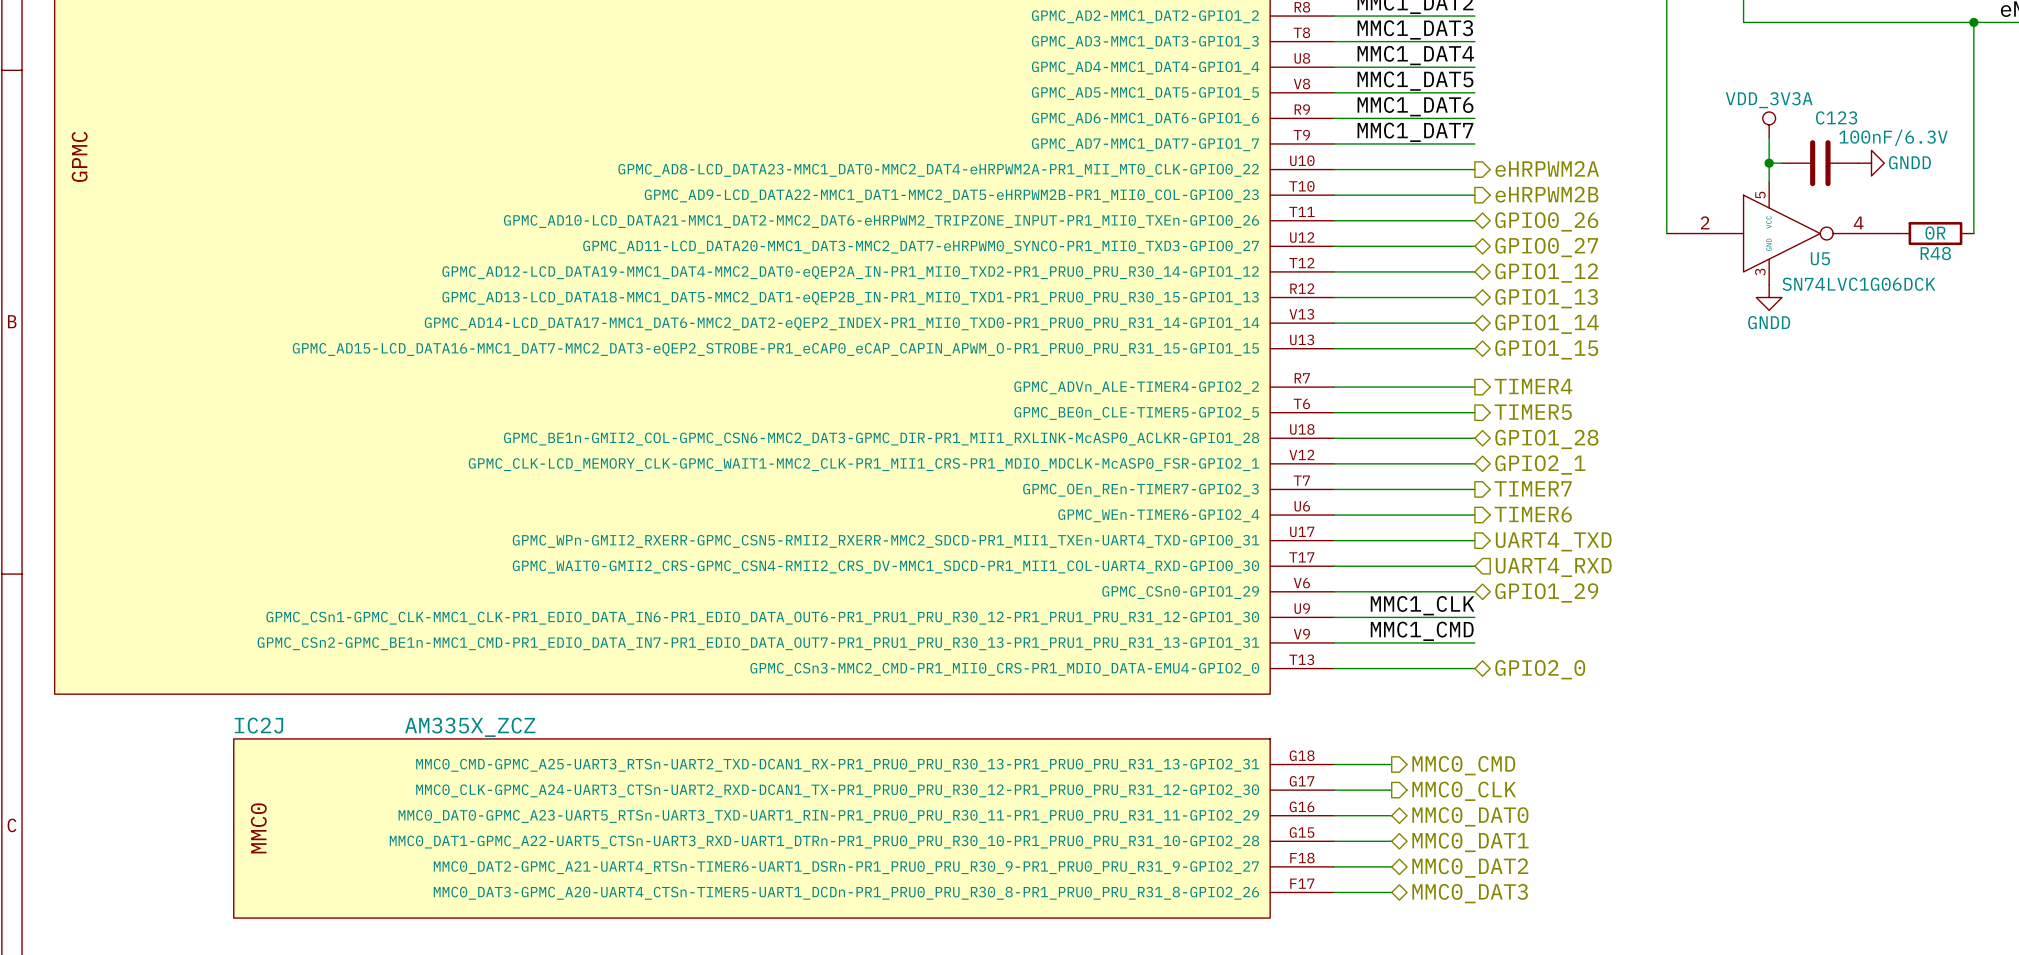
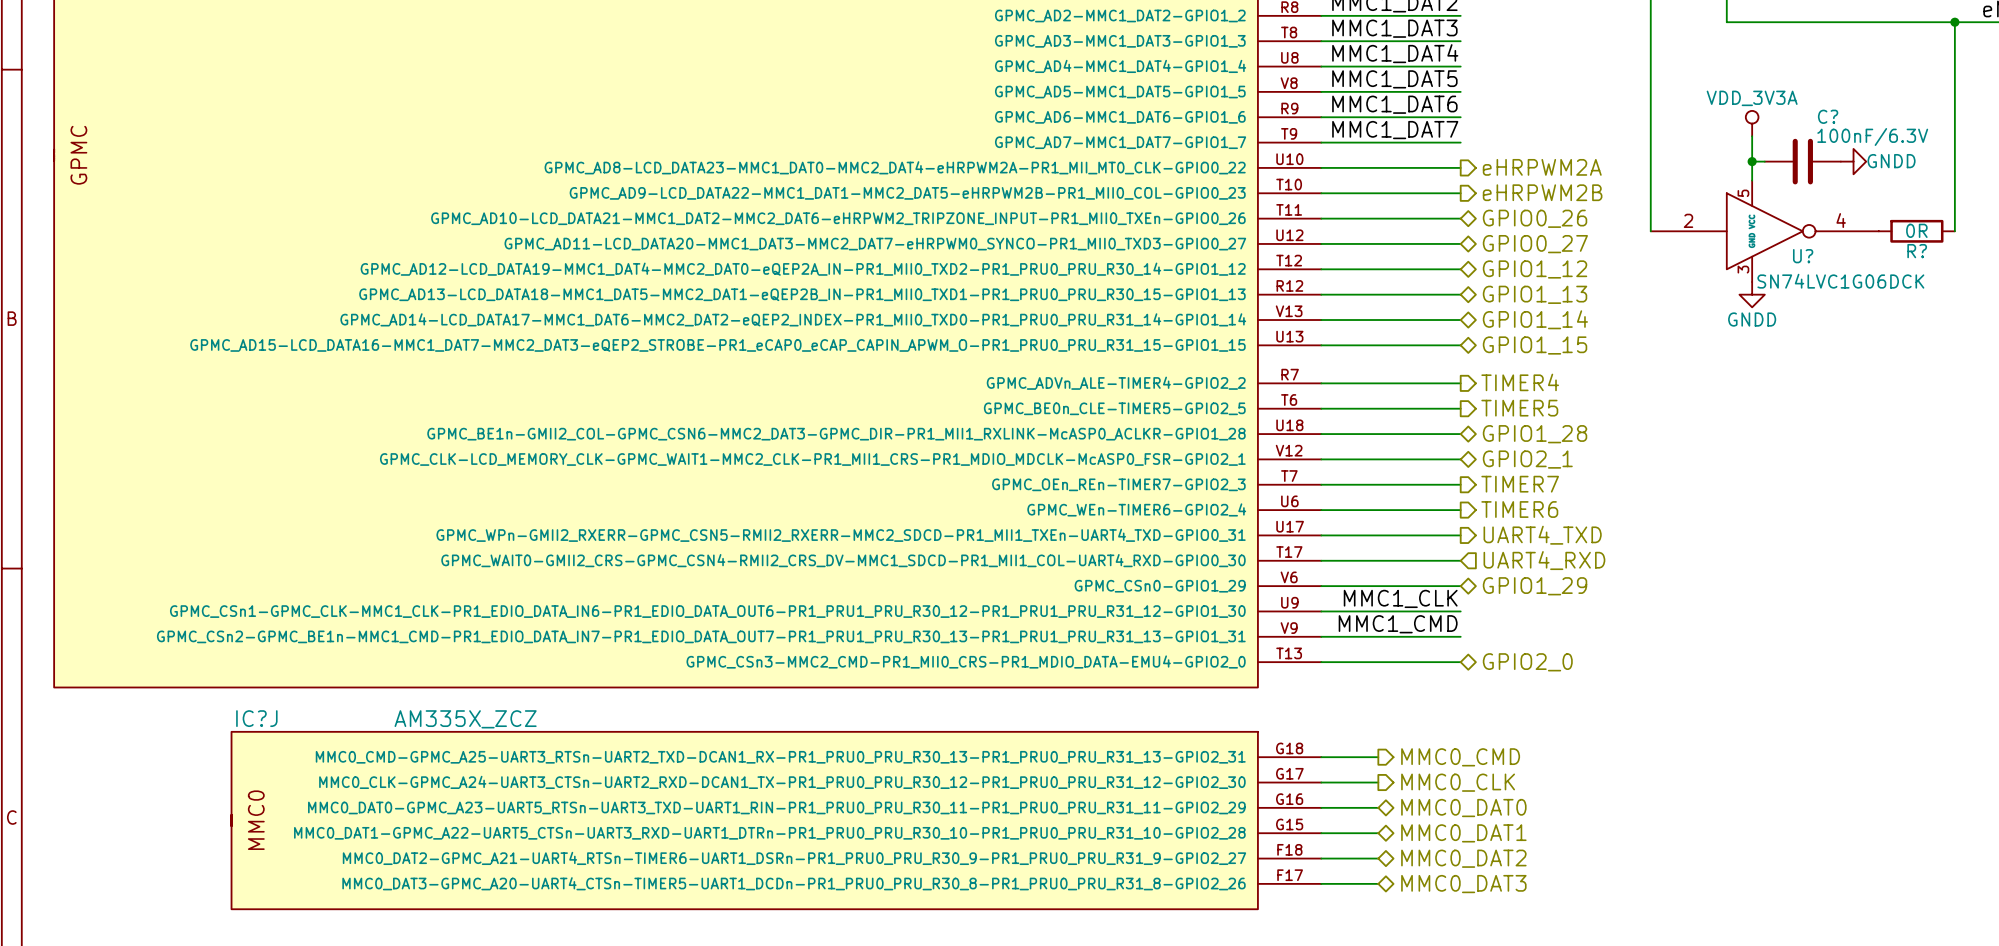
C123 name: C123 (1836, 117) -> C? (1828, 116)
R48 name: R48 (1935, 253) -> R? (1917, 251)
U5 name: U5 (1820, 258) -> U? (1803, 256)
IC2J name: IC2J (258, 725) -> IC?J (256, 718)

